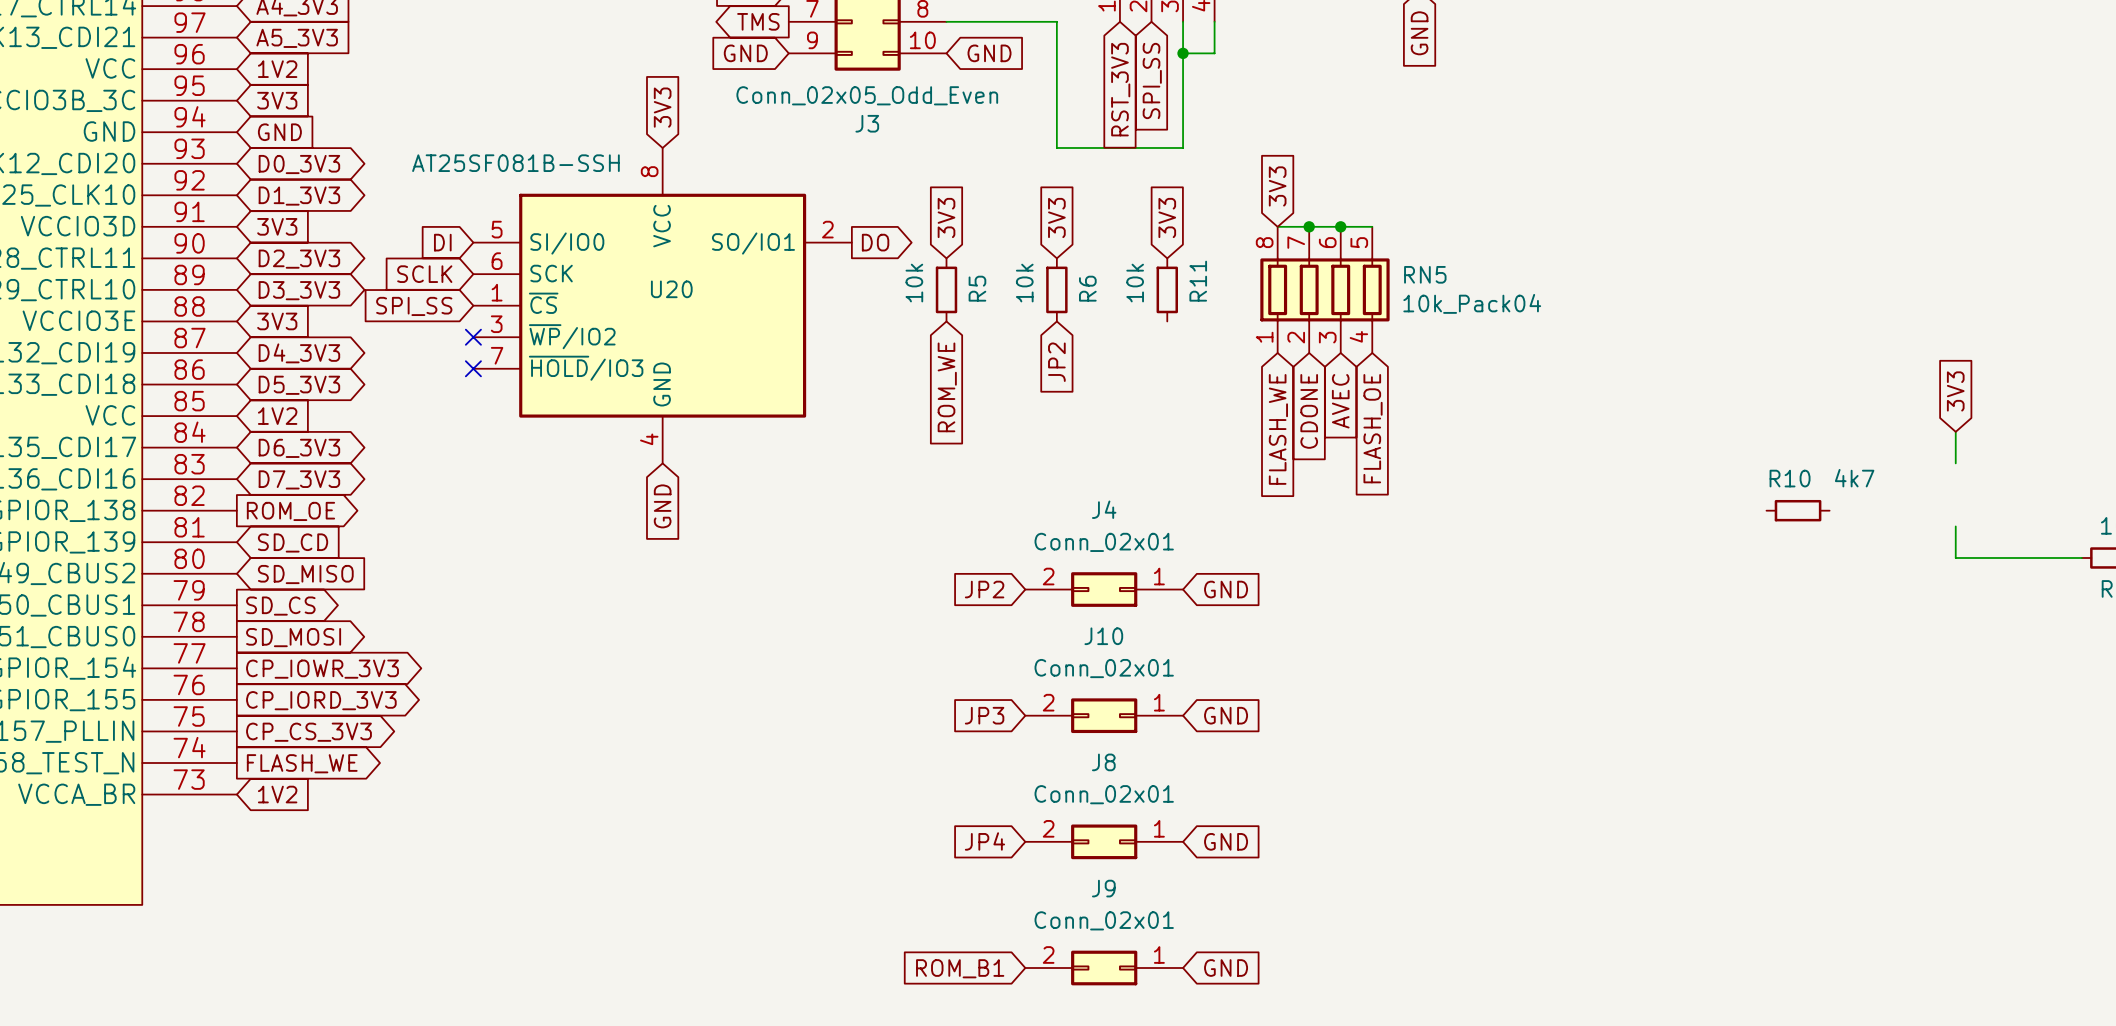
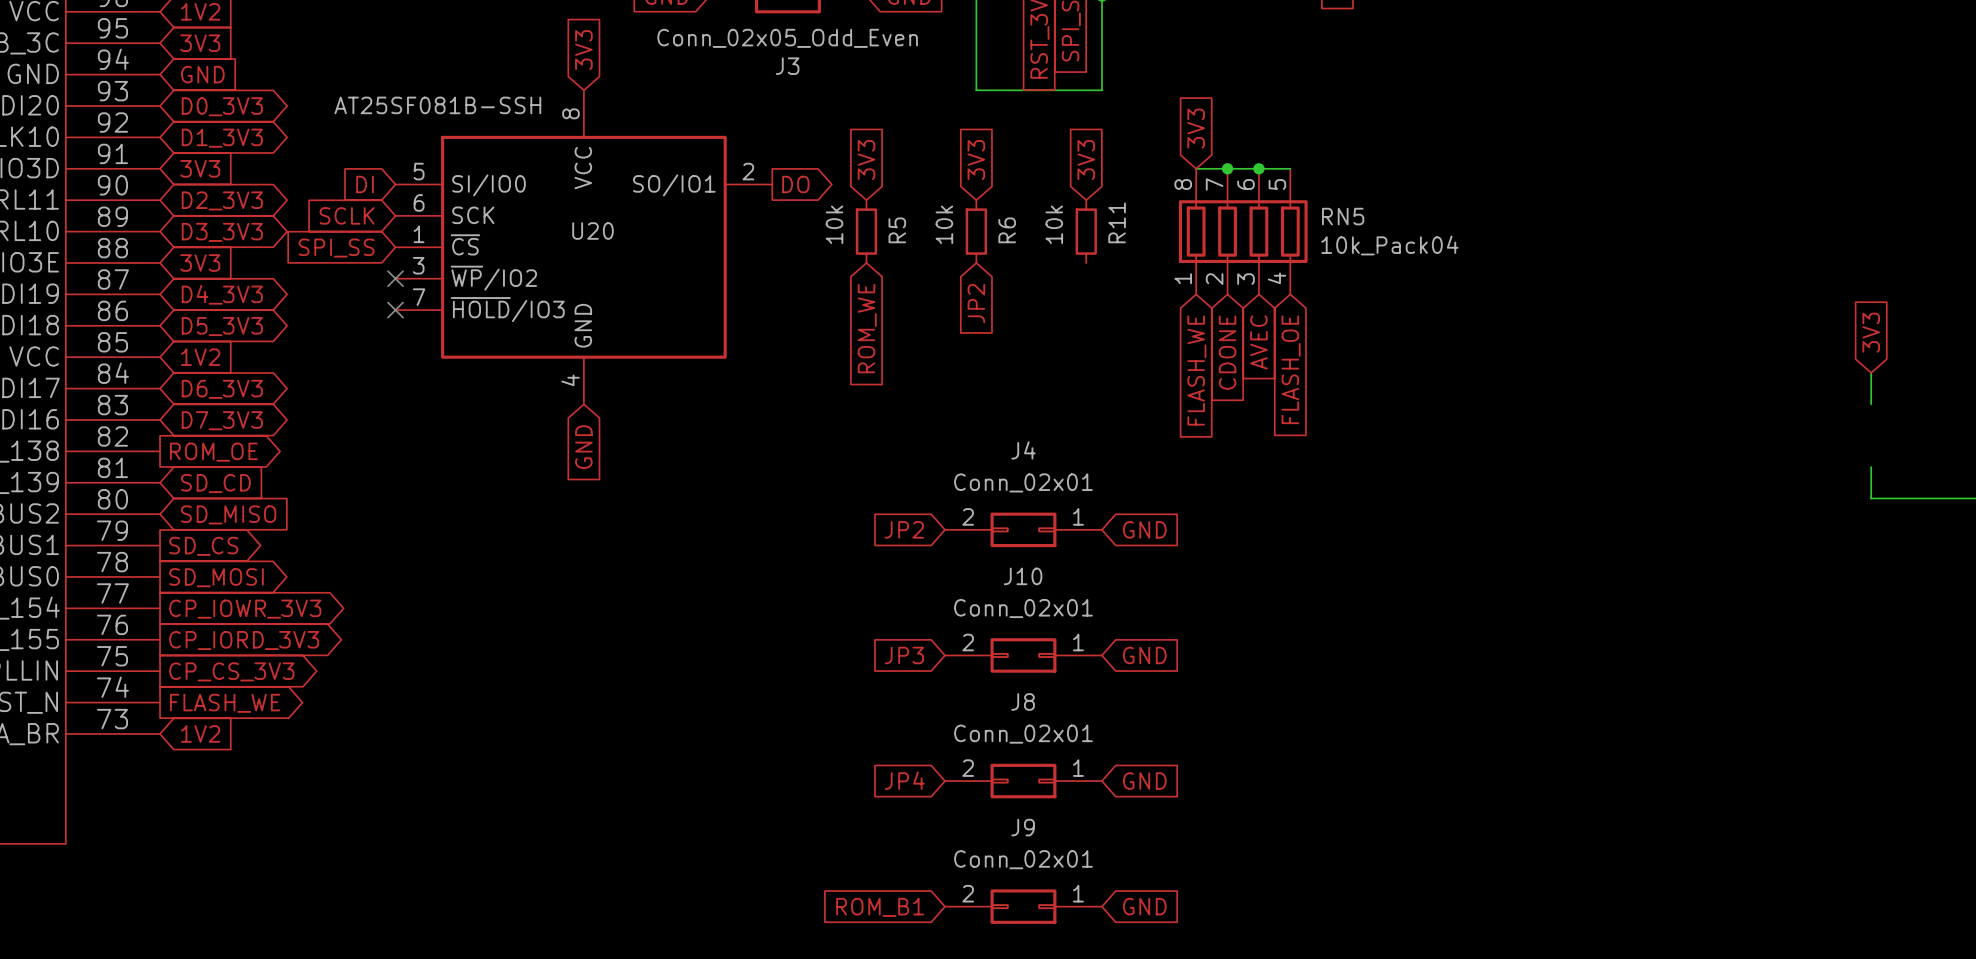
R10: 4k7 (1798, 510) -> none

